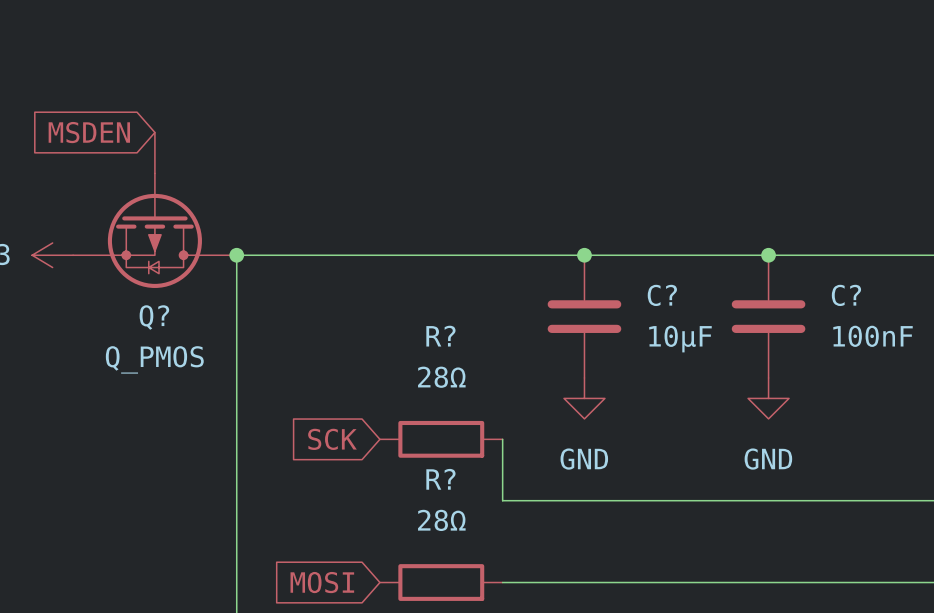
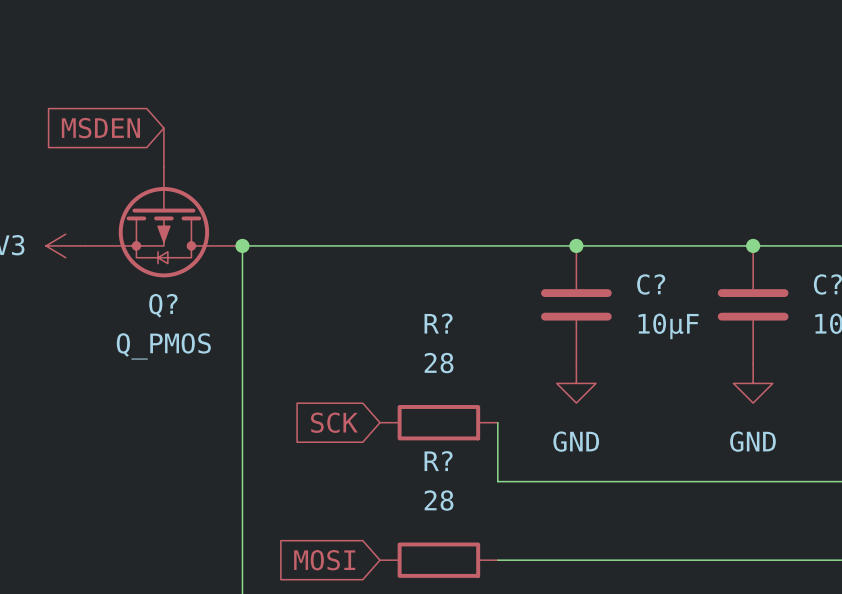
R? value: 28Ω (441, 377) -> 28 (439, 363)
R? value: 28Ω (441, 520) -> 28 (439, 500)

